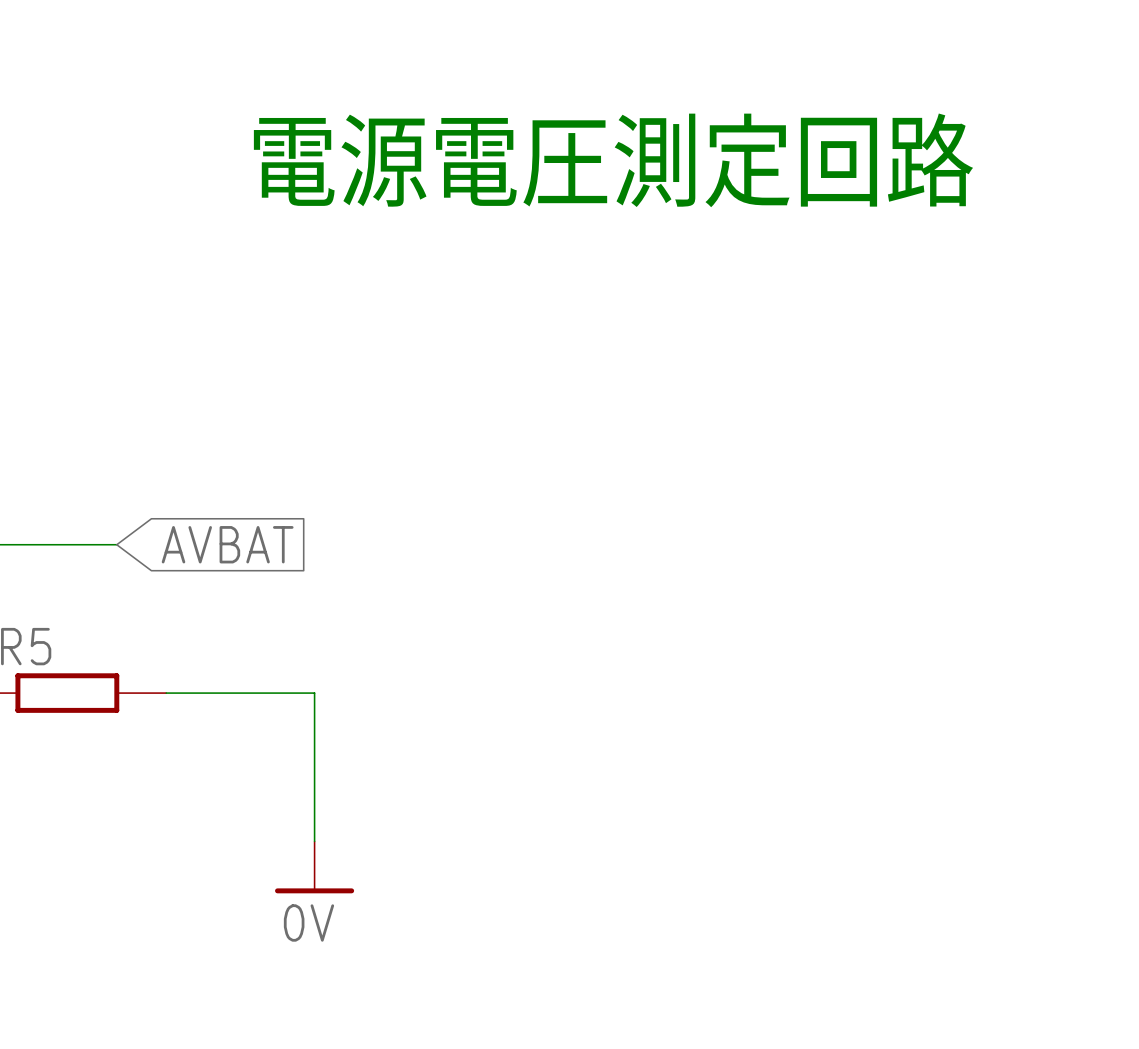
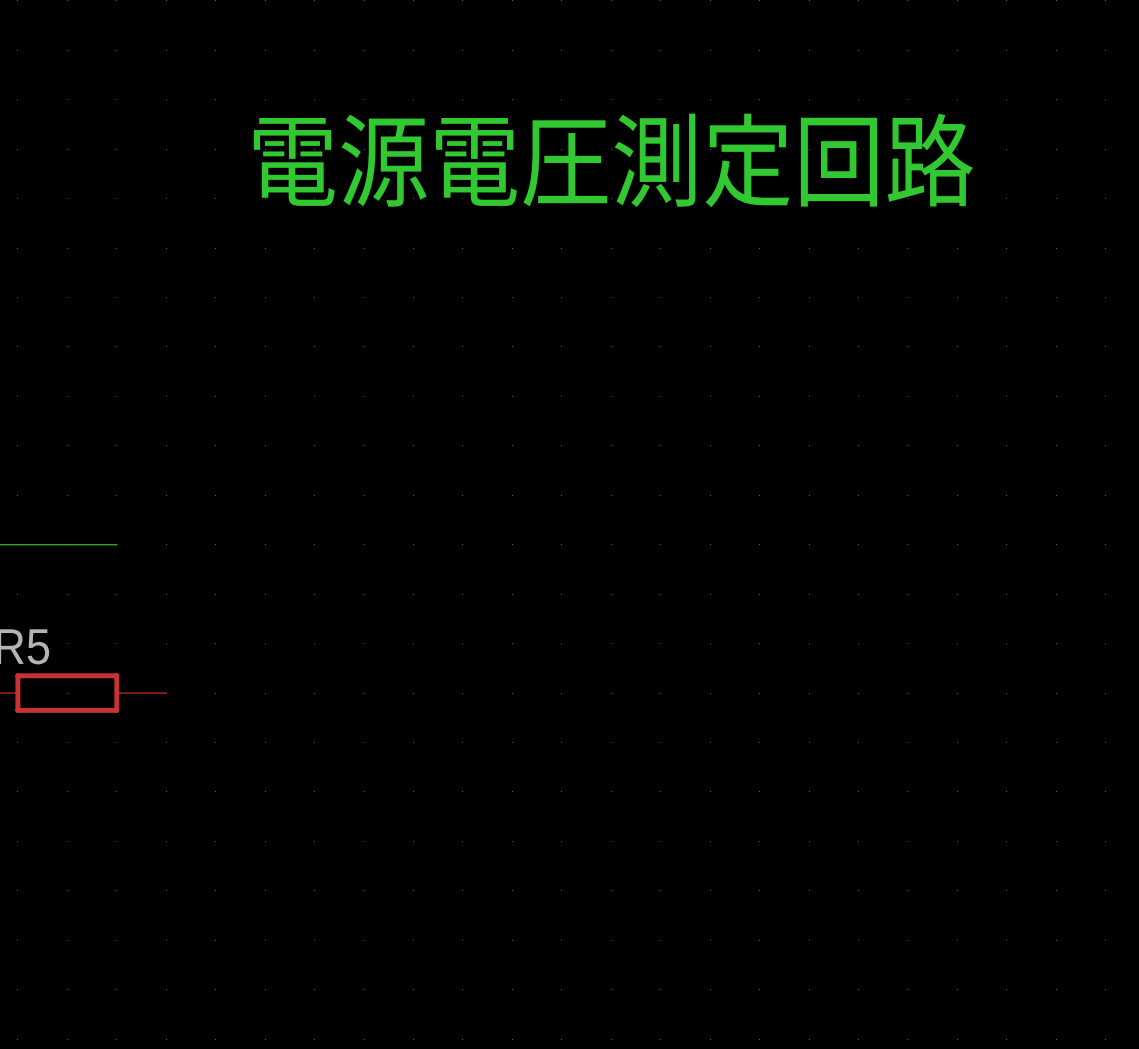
global label: AVBAT (227, 544) -> none
wire: (166, 693) (314, 693) (314, 841) -> none
power symbol: 0V (314, 867) -> none

